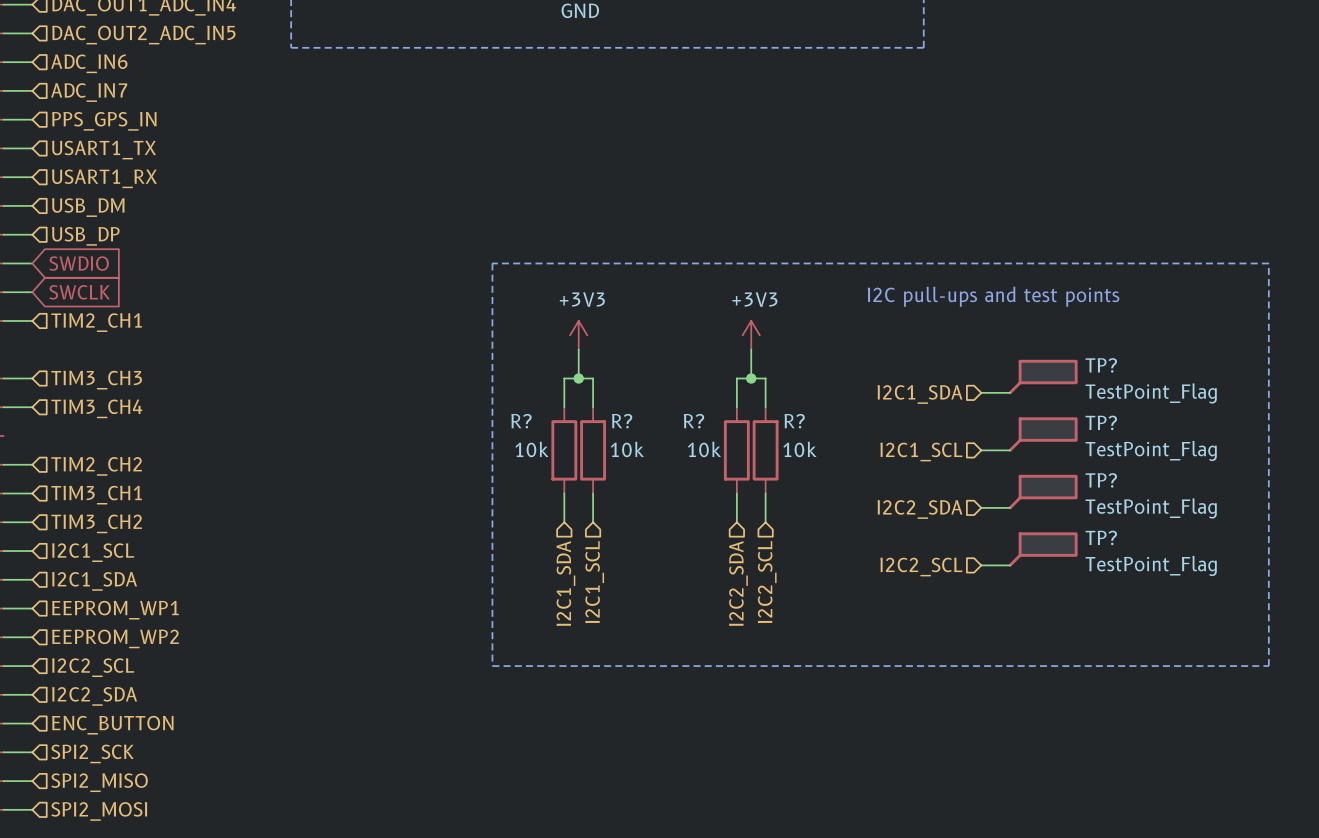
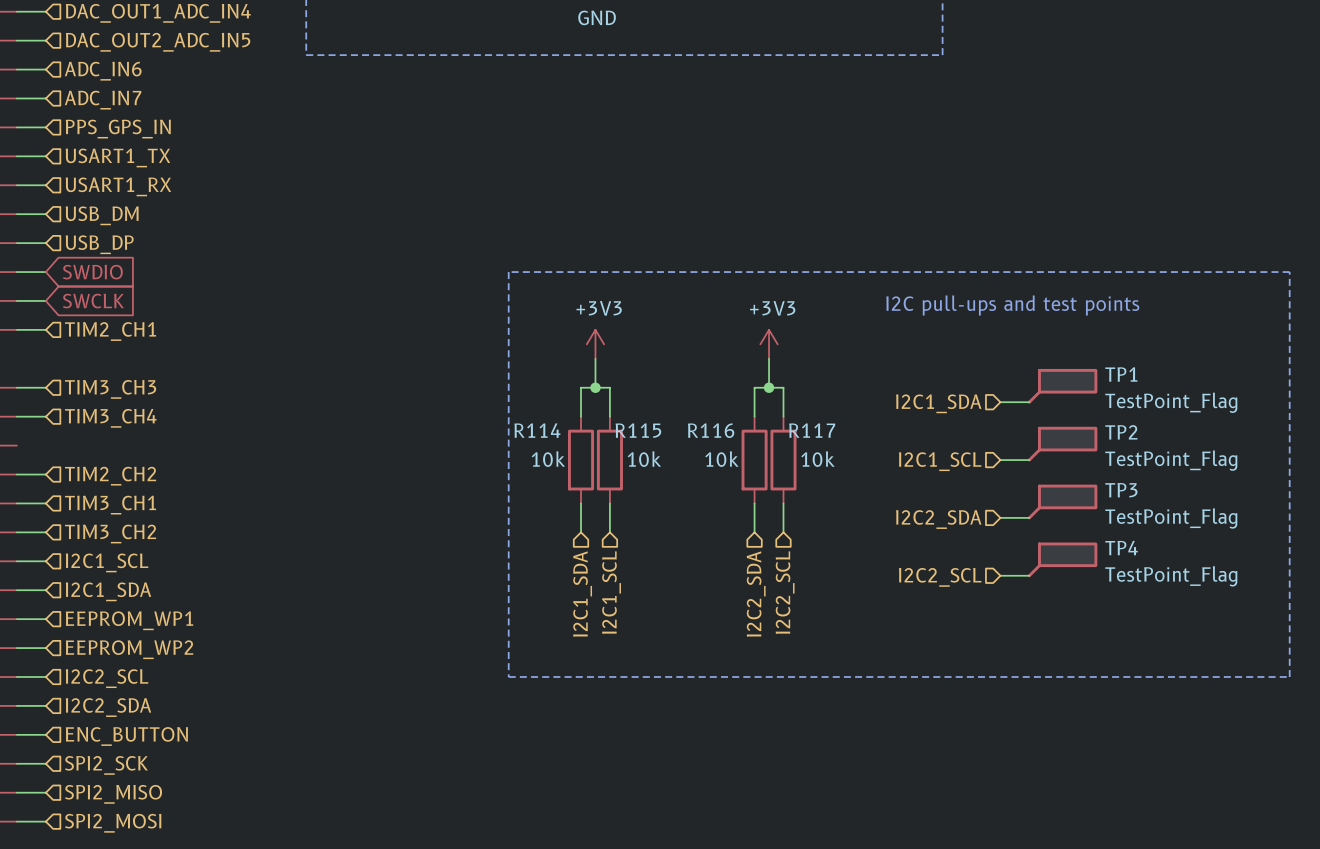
TP? name: TP? (1101, 365) -> TP1 (1121, 374)
R? name: R? (521, 421) -> R114 (537, 430)
R? name: R? (622, 421) -> R115 (638, 430)
R? name: R? (693, 421) -> R116 (711, 430)
R? name: R? (794, 421) -> R117 (812, 430)
TP? name: TP? (1101, 422) -> TP2 (1121, 432)
TP? name: TP? (1101, 480) -> TP3 (1121, 490)
TP? name: TP? (1101, 537) -> TP4 (1121, 548)

